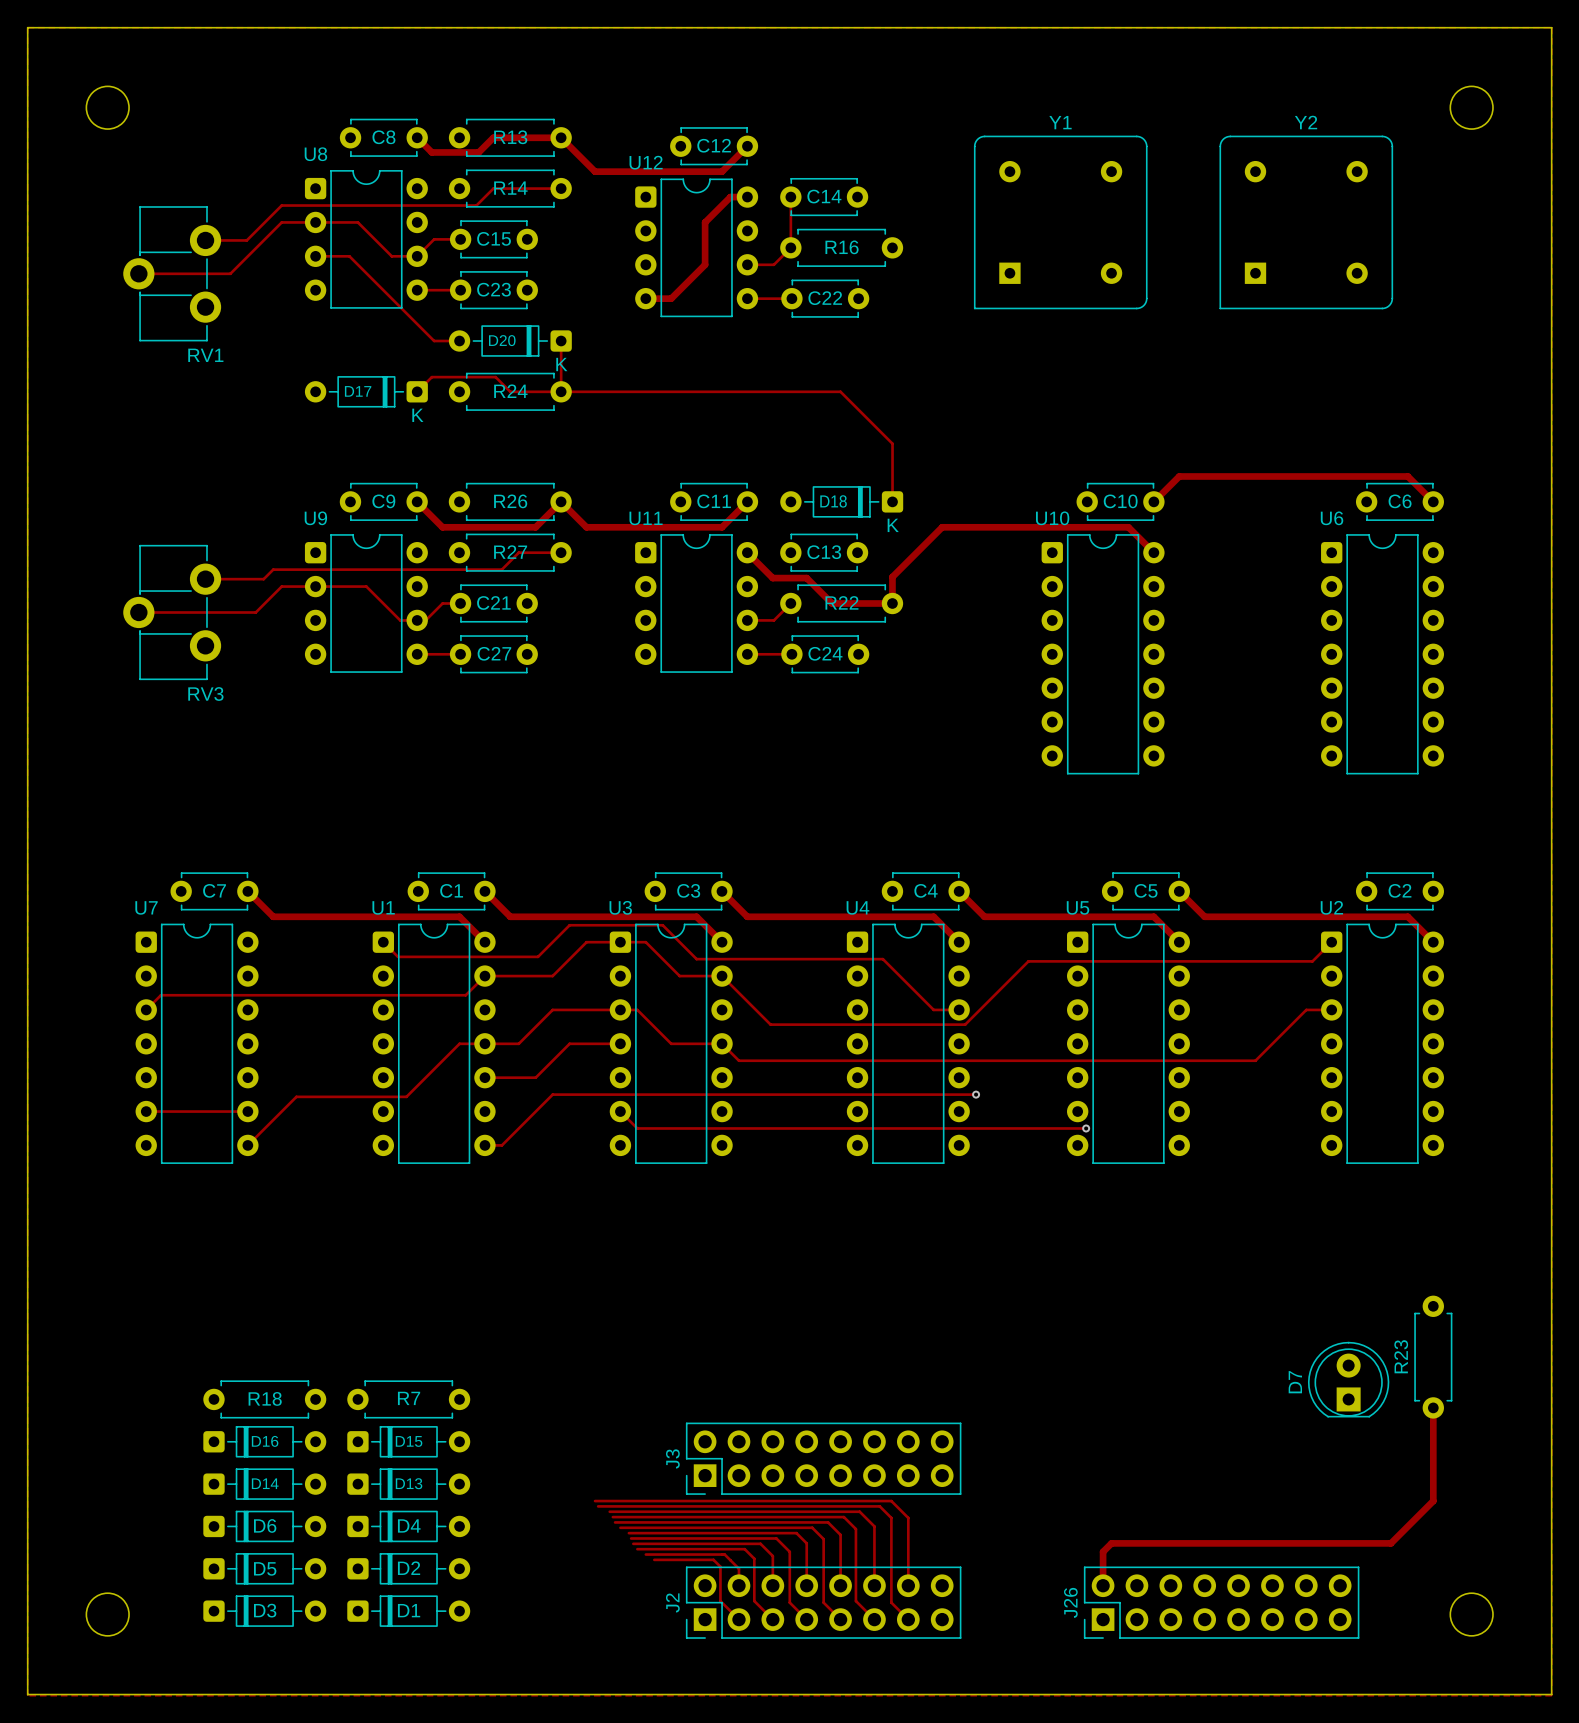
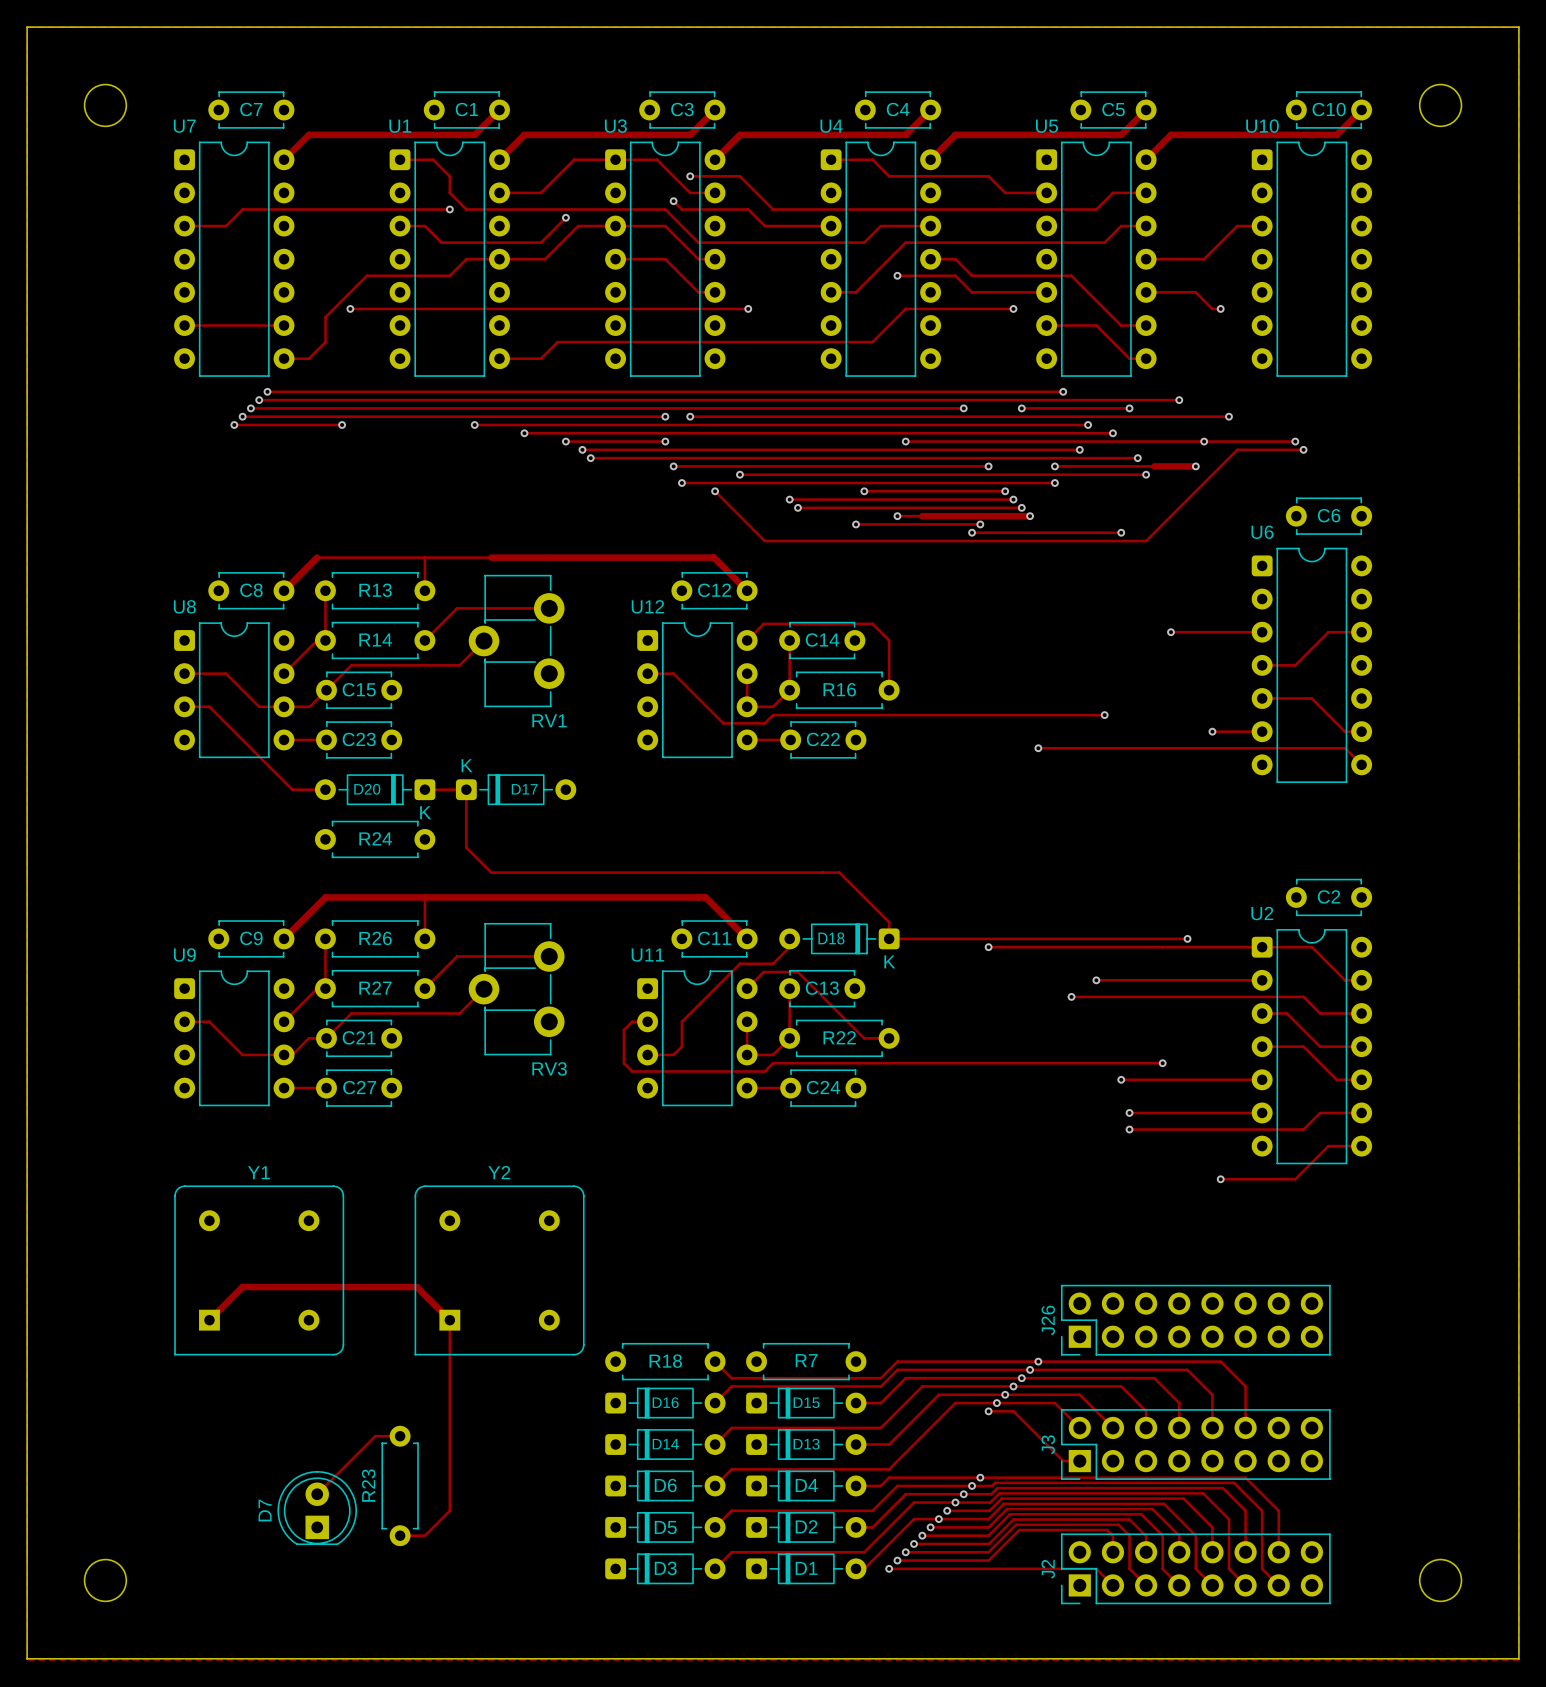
track: none -> (499, 110) (474, 134) (308, 134) (284, 159)
track: none -> (930, 110) (905, 134) (739, 134) (731, 143)
track: none -> (1146, 110) (1121, 134) (955, 134) (930, 159)
track: none -> (1361, 110) (1336, 134) (1170, 134) (1146, 159)
C8 position: (383, 137) -> (251, 590)
track: (417, 137) (431, 152) (478, 152) (493, 137) (535, 137) -> (499, 159) (524, 134)
R13 position: (510, 137) -> (375, 590)
track: (561, 137) (595, 171) (722, 171) (730, 163) -> (549, 134) (690, 134) (715, 110)
C12 position: (714, 146) -> (714, 590)
track: none -> (400, 159) (433, 159) (449, 176) (449, 192) (466, 209) (665, 209) (698, 242) (864, 242) (880, 226) (930, 226)
track: none -> (831, 159) (872, 159) (889, 176) (988, 176) (1005, 192) (1046, 192)
track: none -> (690, 176) (739, 176) (773, 209) (1096, 209) (1112, 192) (1146, 192)
via: none -> (690, 176)
R14 position: (510, 188) -> (375, 640)
track: (561, 188) (493, 188) (476, 205) (281, 205) (246, 240) (205, 240) -> none
track: none -> (499, 192) (541, 192) (574, 159) (657, 159) (690, 192) (715, 192)
track: (747, 197) (730, 197) (705, 222) (705, 264) (671, 298) (645, 298) -> none
track: (790, 197) (790, 247) (773, 264) (747, 264) -> none
C14 position: (824, 197) -> (822, 640)
track: none -> (673, 201) (681, 209) (748, 209) (764, 226) (831, 226)
via: none -> (673, 201)
track: none -> (449, 209) (242, 209) (226, 226) (184, 226)
via: none -> (449, 209)
track: none -> (565, 217) (541, 242) (441, 242) (424, 226) (400, 226)
via: none -> (565, 217)
Y1 position: (1060, 222) -> (259, 1270)
Y2 position: (1306, 222) -> (499, 1270)
track: none -> (1146, 226) (1121, 226) (1104, 242) (905, 242) (856, 292) (831, 292)
track: none -> (1262, 226) (1237, 226) (1204, 259) (1146, 259)
U8 position: (366, 239) -> (234, 690)
track: (460, 239) (434, 239) (417, 256) (391, 256) (357, 222) (281, 222) (230, 273) (138, 273) -> none
C15 position: (493, 239) -> (359, 690)
U12 position: (696, 247) -> (697, 690)
R16 position: (841, 247) -> (839, 690)
track: (315, 256) (349, 256) (434, 341) (459, 341) -> none
track: none -> (615, 259) (665, 259) (698, 292) (715, 292)
track: none -> (715, 259) (698, 259) (665, 226) (578, 226) (545, 259) (466, 259) (449, 275) (366, 275) (325, 317) (325, 342) (308, 358) (284, 358)
track: none -> (930, 259) (955, 259) (972, 275) (1071, 275) (1121, 325) (1146, 325)
RV1 position: (172, 273) -> (516, 641)
track: none -> (897, 275) (955, 275) (972, 292) (1046, 292)
via: none -> (897, 275)
track: (417, 290) (460, 290) -> none
C23 position: (493, 290) -> (359, 739)
track: (747, 298) (791, 298) -> none
C22 position: (825, 298) -> (823, 739)
track: none -> (1146, 292) (1195, 292) (1212, 308) (1220, 308)
track: none -> (350, 308) (748, 308)
via: none -> (350, 308)
via: none -> (748, 308)
track: none -> (1013, 308) (905, 308) (872, 342) (557, 342) (541, 358) (499, 358)
via: none -> (1013, 308)
via: none -> (1220, 308)
track: none -> (184, 325) (284, 325)
track: none -> (1046, 325) (1096, 325) (1129, 358) (1146, 358)
D20 position: (510, 341) -> (375, 789)
track: (561, 341) (561, 391) -> none
D17 rotation: 0° (366, 391) -> 180° (516, 789)
D17 position: (366, 391) -> (516, 789)
track: (417, 391) (431, 377) (495, 377) (510, 391) (840, 391) (892, 443) (892, 501) -> none
R24 position: (510, 391) -> (375, 839)
track: none -> (267, 391) (1063, 391)
via: none -> (267, 391)
via: none -> (1063, 391)
track: none -> (259, 400) (1179, 400)
via: none -> (259, 400)
via: none -> (1179, 400)
track: none -> (250, 408) (963, 408)
via: none -> (250, 408)
via: none -> (963, 408)
track: none -> (1021, 408) (1129, 408)
via: none -> (1021, 408)
via: none -> (1129, 408)
track: none -> (242, 416) (665, 416)
via: none -> (242, 416)
via: none -> (665, 416)
track: none -> (690, 416) (1229, 416)
via: none -> (690, 416)
via: none -> (1229, 416)
track: none -> (234, 424) (342, 424)
via: none -> (234, 424)
via: none -> (342, 424)
track: none -> (474, 424) (1088, 424)
via: none -> (474, 424)
via: none -> (1088, 424)
track: none -> (524, 433) (1112, 433)
via: none -> (524, 433)
via: none -> (1112, 433)
track: none -> (565, 441) (665, 441)
via: none -> (565, 441)
via: none -> (665, 441)
track: none -> (905, 441) (1295, 441)
via: none -> (905, 441)
via: none -> (1204, 441)
via: none -> (1295, 441)
track: none -> (582, 449) (1079, 449)
via: none -> (582, 449)
via: none -> (1079, 449)
track: none -> (1303, 449) (1237, 449) (1146, 541) (764, 541) (715, 491)
via: none -> (1303, 449)
track: none -> (590, 458) (1137, 458)
via: none -> (590, 458)
via: none -> (1137, 458)
track: none -> (673, 466) (988, 466)
via: none -> (673, 466)
via: none -> (988, 466)
via: none -> (1054, 466)
track: (1179, 476) (1153, 501) -> (1154, 466) (1054, 466)
track: (1221, 476) (1407, 476) (1433, 501) -> none
via: none -> (1195, 466)
track: none -> (739, 474) (1146, 474)
via: none -> (739, 474)
via: none -> (1146, 474)
track: none -> (681, 483) (1054, 483)
via: none -> (681, 483)
via: none -> (1054, 483)
C9 position: (383, 501) -> (251, 938)
track: (417, 501) (442, 527) (535, 527) (561, 501) (586, 527) (722, 527) (747, 501) -> none
R26 position: (510, 501) -> (375, 938)
C11 position: (714, 501) -> (714, 938)
via: none -> (715, 491)
D18 position: (841, 501) -> (839, 938)
track: none -> (864, 491) (1005, 491)
via: none -> (864, 491)
via: none -> (1005, 491)
C10 position: (1120, 501) -> (1328, 110)
C6 position: (1399, 501) -> (1328, 516)
track: none -> (789, 499) (1013, 499)
via: none -> (789, 499)
via: none -> (1013, 499)
track: none -> (797, 507) (1021, 507)
via: none -> (797, 507)
via: none -> (1021, 507)
via: none -> (897, 516)
track: (942, 527) (892, 577) (892, 603) (832, 603) (806, 578) (772, 578) (747, 552) -> (922, 516) (897, 516)
track: (1052, 527) (1128, 527) (1153, 552) -> none
via: none -> (1030, 516)
track: none -> (856, 524) (980, 524)
via: none -> (856, 524)
via: none -> (980, 524)
track: none -> (972, 532) (1121, 532)
via: none -> (972, 532)
via: none -> (1121, 532)
R27 position: (510, 552) -> (375, 988)
track: (561, 552) (518, 552) (501, 569) -> (747, 590) (713, 557) (491, 557)
C13 position: (824, 552) -> (822, 988)
track: (324, 569) (273, 569) (263, 579) (205, 579) -> (317, 557) (284, 590)
track: none -> (424, 557) (424, 590)
track: none -> (325, 590) (325, 640) (317, 640) (284, 673)
U9 position: (366, 603) -> (234, 1038)
track: (460, 603) (442, 603) (425, 620) (400, 620) (366, 586) (281, 586) (255, 612) (138, 612) -> none
C21 position: (493, 603) -> (359, 1038)
U11 position: (696, 603) -> (697, 1038)
track: (790, 603) (773, 620) (747, 620) -> none
R22 position: (841, 603) -> (839, 1038)
RV3 position: (172, 612) -> (516, 989)
track: none -> (549, 608) (457, 608) (424, 640)
track: none -> (1170, 632) (1262, 632)
via: none -> (1170, 632)
track: none -> (1361, 632) (1328, 632) (1295, 665) (1262, 665)
track: (417, 654) (460, 654) -> (284, 739) (326, 739)
C27 position: (493, 654) -> (359, 1088)
track: none -> (483, 641) (459, 665) (351, 665) (309, 706) (259, 706) (225, 673) (184, 673)
track: (747, 654) (791, 654) -> (747, 739) (790, 739)
track: none -> (747, 640) (763, 623) (872, 623) (889, 640) (889, 690)
track: none -> (789, 640) (789, 690) (773, 706) (747, 706) (747, 673)
C24 position: (825, 654) -> (823, 1088)
U10 position: (1103, 654) -> (1311, 259)
U6 position: (1382, 654) -> (1311, 665)
track: none -> (647, 673) (673, 673) (723, 723) (764, 723) (773, 715) (1104, 715)
track: none -> (1262, 698) (1311, 698) (1345, 731) (1361, 731)
track: none -> (184, 706) (209, 706) (292, 789) (325, 789)
via: none -> (1104, 715)
track: none -> (1212, 731) (1262, 731)
via: none -> (1212, 731)
track: none -> (1038, 748) (1345, 748) (1361, 764)
via: none -> (1038, 748)
track: none -> (424, 789) (466, 789) (466, 847) (491, 872) (839, 872) (889, 922) (889, 938) (1187, 938)
C7 position: (214, 891) -> (251, 110)
track: (247, 891) (273, 916) (332, 916) -> (284, 938) (325, 897)
C1 position: (451, 891) -> (466, 110)
track: (484, 891) (510, 916) -> (449, 897) (499, 897)
C3 position: (688, 891) -> (682, 110)
track: (721, 891) (747, 916) (933, 916) (959, 942) -> none
C4 position: (925, 891) -> (897, 110)
track: (959, 891) (984, 916) (1153, 916) (1179, 942) -> none
C5 position: (1145, 891) -> (1113, 110)
track: (1179, 891) (1204, 916) (1407, 916) (1433, 942) -> none
C2 position: (1399, 891) -> (1328, 897)
track: none -> (424, 897) (424, 938)
track: (459, 916) (484, 942) -> none
track: (696, 916) (722, 942) -> (681, 897) (705, 897) (747, 938)
track: (383, 942) (398, 956) (538, 956) (569, 925) (662, 925) (696, 959) (882, 959) (933, 1009) (959, 1009) -> none
track: (1331, 942) (1312, 961) (1028, 961) (965, 1024) (770, 1024) (722, 976) (679, 976) (645, 942) (586, 942) (552, 976) (484, 976) (465, 995) (160, 995) (146, 1009) -> none
track: none -> (325, 938) (325, 988) (317, 988) (284, 1021)
track: none -> (789, 938) (789, 947) (773, 963) (739, 963) (681, 1021) (681, 1046) (673, 1054) (647, 1054)
via: none -> (1187, 938)
track: none -> (988, 947) (1311, 947) (1345, 980) (1361, 980)
via: none -> (988, 947)
track: none -> (549, 956) (457, 956) (424, 988)
track: none -> (1096, 980) (1262, 980)
via: none -> (1096, 980)
track: none -> (789, 988) (789, 1038) (773, 1054) (747, 1054) (747, 1021)
track: (1331, 1009) (1306, 1009) (1255, 1060) (908, 1060) -> none
track: none -> (483, 989) (459, 1013) (351, 1013) (326, 1038) (308, 1038) (292, 1054) (242, 1054) (209, 1021) (184, 1021)
track: none -> (1071, 996) (1303, 996) (1320, 1013) (1361, 1013)
via: none -> (1071, 996)
track: none -> (1262, 1013) (1287, 1013) (1320, 1046) (1361, 1046)
U7 position: (197, 1043) -> (234, 259)
U1 position: (434, 1043) -> (449, 259)
track: (620, 1043) (569, 1043) (535, 1077) (484, 1077) -> none
U3 position: (671, 1043) -> (665, 259)
U4 position: (908, 1043) -> (880, 259)
U5 position: (1128, 1043) -> (1096, 259)
U2 position: (1382, 1043) -> (1311, 1046)
track: (882, 1060) (738, 1060) (722, 1043) (671, 1043) (637, 1009) (552, 1009) (518, 1043) (459, 1043) (406, 1096) (296, 1096) (247, 1145) -> (864, 1038) (797, 972) (763, 972) (747, 988)
track: none -> (1262, 1046) (1303, 1046) (1336, 1079) (1361, 1079)
via: none -> (1162, 1063)
track: (645, 1094) (552, 1094) (501, 1145) (484, 1145) -> (632, 1071) (623, 1063) (623, 1030) (632, 1021) (647, 1021)
track: (781, 1094) (976, 1094) -> (764, 1071) (773, 1063) (1162, 1063)
via: (976, 1094) -> none
track: none -> (1121, 1079) (1262, 1079)
via: none -> (1121, 1079)
track: (146, 1111) (247, 1111) -> none
track: none -> (284, 1088) (326, 1088)
track: (620, 1111) (637, 1128) (1086, 1128) -> none
track: none -> (747, 1088) (790, 1088)
via: (1086, 1128) -> none
track: none -> (1129, 1112) (1262, 1112)
via: none -> (1129, 1112)
track: none -> (1361, 1112) (1320, 1112) (1303, 1129) (1129, 1129)
via: none -> (1129, 1129)
track: none -> (1361, 1146) (1328, 1146) (1295, 1179) (1220, 1179)
via: none -> (1220, 1179)
track: none -> (209, 1320) (242, 1287) (416, 1287) (449, 1320) (449, 1510) (424, 1535) (400, 1535)
J26: none -> (1195, 1320)
R23 position: (1433, 1357) -> (400, 1485)
D7 position: (1348, 1379) -> (317, 1508)
track: none -> (715, 1361) (731, 1378) (880, 1378) (897, 1361) (1220, 1361) (1245, 1386) (1245, 1427)
via: none -> (1038, 1361)
R18 position: (264, 1399) -> (665, 1361)
R7 position: (408, 1399) -> (806, 1361)
via: none -> (1030, 1369)
via: none -> (1021, 1378)
track: (1433, 1407) (1433, 1501) (1390, 1543) (1111, 1543) (1103, 1551) (1103, 1585) -> none
via: none -> (1013, 1386)
via: none -> (1005, 1394)
track: none -> (715, 1403) (731, 1386) (880, 1386) (897, 1369) (1187, 1369) (1212, 1394) (1212, 1427)
track: none -> (856, 1403) (880, 1403) (905, 1378) (1154, 1378) (1179, 1403) (1179, 1427)
via: none -> (996, 1403)
D16 position: (264, 1441) -> (665, 1403)
D15 position: (408, 1441) -> (806, 1403)
track: none -> (988, 1411) (1013, 1411) (1063, 1461) (1079, 1461)
via: none -> (988, 1411)
J3 position: (823, 1458) -> (1195, 1444)
track: none -> (1112, 1427) (1079, 1394) (938, 1394) (889, 1444) (856, 1444)
track: none -> (1146, 1427) (1146, 1411) (1121, 1386) (922, 1386) (880, 1427) (731, 1427) (715, 1444)
track: none -> (400, 1436) (375, 1436) (317, 1494)
D14 position: (264, 1484) -> (665, 1444)
D13 position: (408, 1484) -> (806, 1444)
track: (595, 1501) (747, 1501) -> (715, 1485) (731, 1469)
track: (891, 1501) (908, 1517) (908, 1585) -> (872, 1469) (889, 1469) (955, 1403) (1054, 1403) (1079, 1427)
track: (598, 1506) (879, 1506) (891, 1517) (891, 1602) (908, 1619) -> none
via: none -> (980, 1477)
track: (609, 1511) (859, 1511) (874, 1526) (874, 1585) -> none
track: (612, 1517) (843, 1517) (855, 1529) (855, 1601) (874, 1619) -> none
track: none -> (856, 1485) (880, 1485) (889, 1477) (1245, 1477) (1278, 1510) (1278, 1552)
via: none -> (972, 1485)
track: (615, 1522) (828, 1522) (840, 1534) (840, 1585) -> none
D6 position: (264, 1526) -> (665, 1485)
D4 position: (408, 1526) -> (806, 1485)
via: none -> (963, 1494)
track: (620, 1527) (812, 1527) (823, 1539) (823, 1602) (840, 1619) -> none
track: (628, 1533) (796, 1533) (806, 1543) (806, 1585) -> none
via: none -> (955, 1502)
track: (631, 1538) (776, 1538) (789, 1551) (789, 1602) (806, 1619) -> none
track: (633, 1543) (760, 1543) (772, 1556) (772, 1585) -> none
track: none -> (947, 1510) (989, 1510) (1001, 1498) (1183, 1498) (1212, 1527) (1212, 1552)
via: none -> (947, 1510)
track: (637, 1549) (744, 1549) (754, 1558) (754, 1601) (772, 1619) -> none
via: none -> (938, 1519)
track: (645, 1554) (724, 1554) (738, 1568) (738, 1585) -> none
track: (654, 1559) (713, 1559) (720, 1566) (720, 1601) (738, 1619) -> none
track: none -> (715, 1527) (731, 1510) (872, 1510) (897, 1485) (992, 1485) (995, 1482) (1234, 1482) (1262, 1510) (1262, 1568) (1278, 1585)
track: none -> (856, 1527) (872, 1527) (905, 1494) (991, 1494) (997, 1488) (1222, 1488) (1245, 1510) (1245, 1552)
track: none -> (930, 1527) (988, 1527) (1006, 1509) (1152, 1509) (1179, 1535) (1179, 1552)
via: none -> (930, 1527)
D5 position: (264, 1568) -> (665, 1527)
D2 position: (408, 1568) -> (806, 1527)
track: none -> (922, 1535) (988, 1535) (1010, 1514) (1141, 1514) (1162, 1535) (1162, 1568) (1179, 1585)
via: none -> (922, 1535)
track: none -> (914, 1543) (989, 1543) (1013, 1519) (1129, 1519) (1146, 1536) (1146, 1552)
via: none -> (914, 1543)
track: none -> (905, 1552) (988, 1552) (1016, 1524) (1118, 1524) (1129, 1535) (1129, 1568) (1146, 1585)
via: none -> (905, 1552)
track: none -> (1112, 1552) (1112, 1535) (1107, 1530) (1019, 1530) (988, 1560) (897, 1560)
via: none -> (897, 1560)
track: none -> (715, 1568) (731, 1552) (864, 1552) (914, 1502) (990, 1502) (999, 1493) (1203, 1493) (1229, 1519) (1229, 1568) (1245, 1585)
J2: (823, 1602) -> none
track: none -> (856, 1568) (864, 1568) (914, 1519) (988, 1519) (1003, 1503) (1164, 1503) (1195, 1535) (1195, 1568) (1212, 1585)
track: none -> (889, 1568) (1096, 1568) (1112, 1585)
via: none -> (889, 1568)
J26 name: J26 (1070, 1602) -> J2 (1048, 1569)
D3 position: (264, 1611) -> (665, 1568)
D1 position: (408, 1611) -> (806, 1568)

